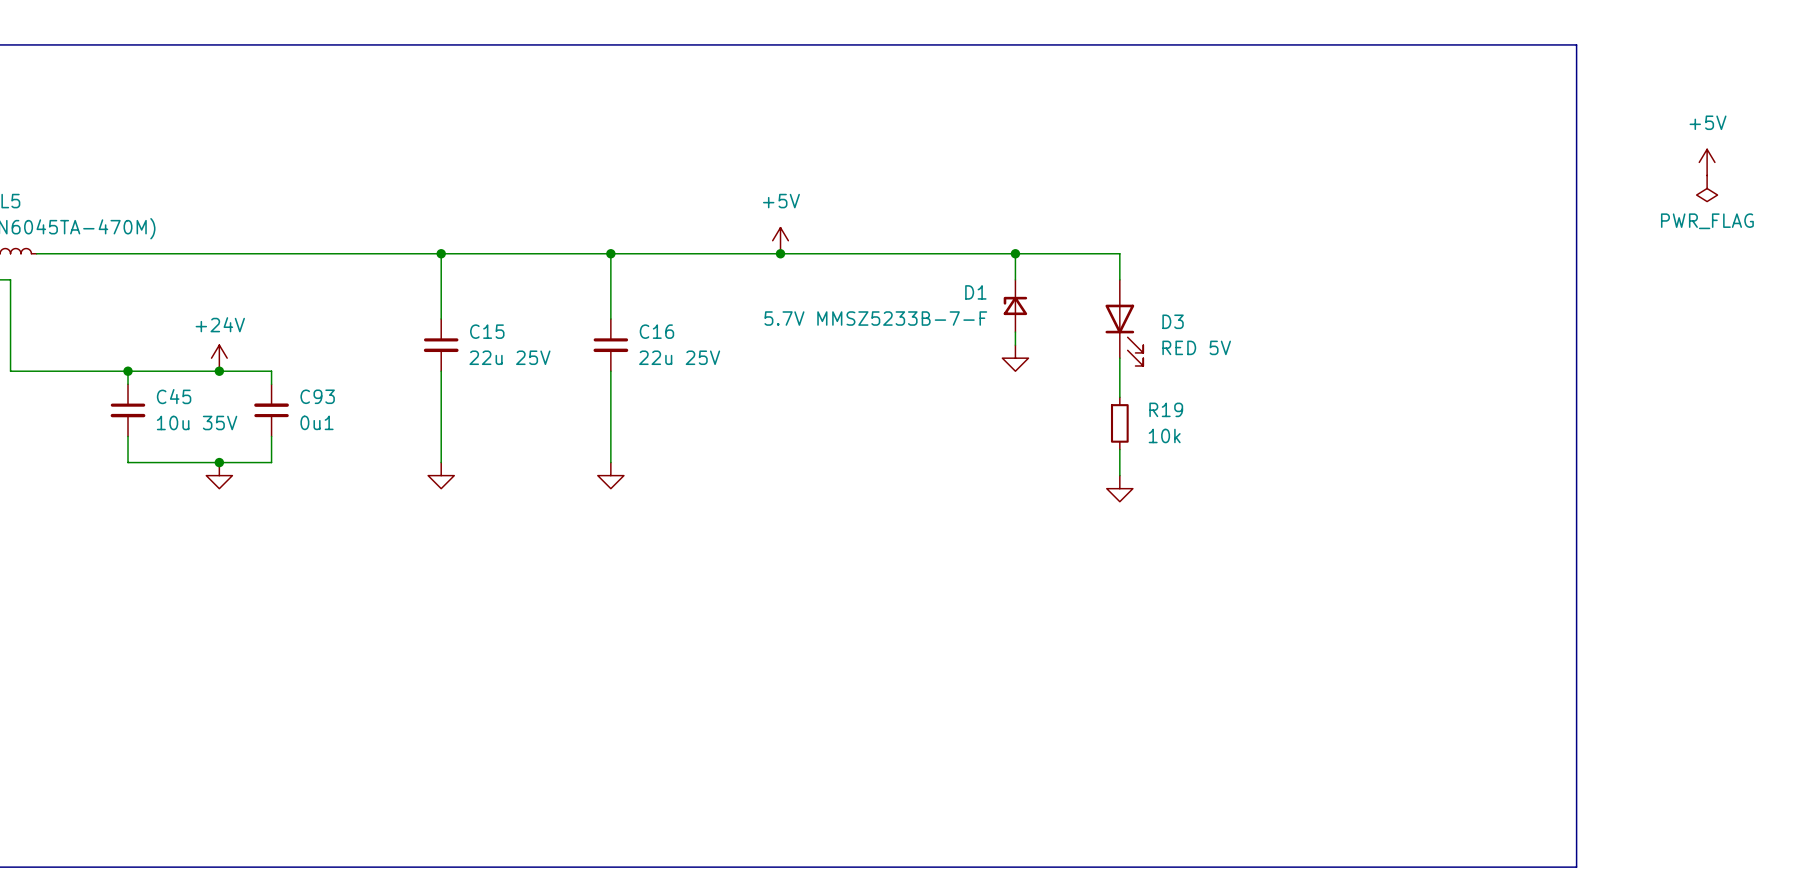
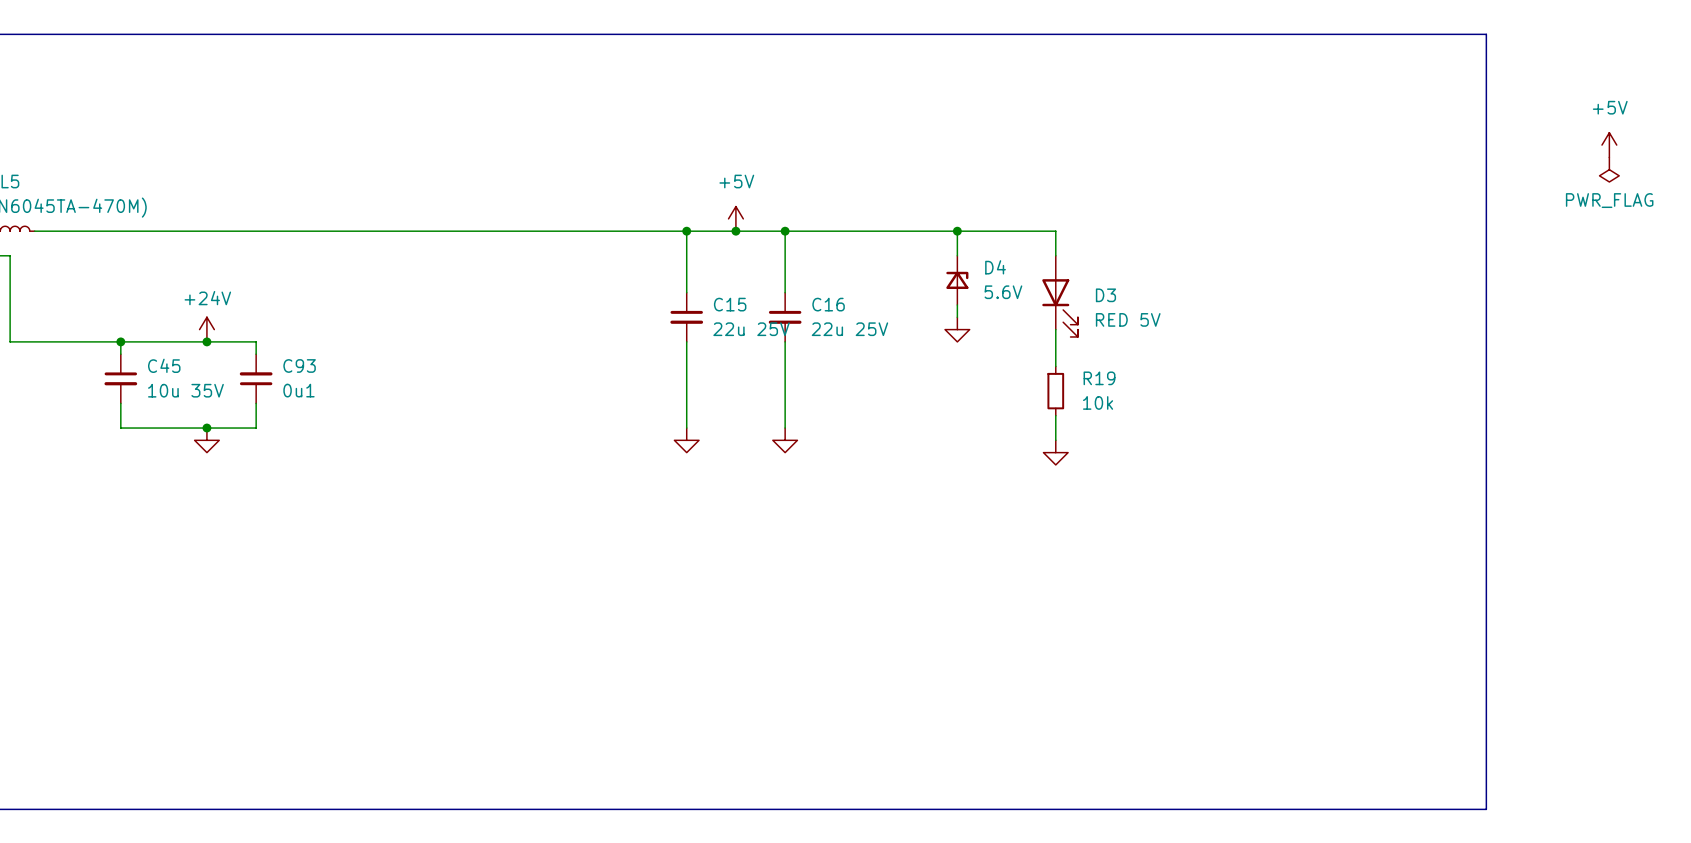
wire: (441, 253) (441, 319) -> none
junction: (441, 253) -> none
wire: (610, 253) (610, 319) -> (686, 231) (686, 292)
junction: (610, 253) -> none
junction: none -> (686, 231)
wire: none -> (785, 231) (785, 292)
junction: none -> (785, 231)
D1: 5.7V MMSZ5233B-7-F (1015, 305) -> none
D4: none -> 5.6V (957, 280)
C15 position: (441, 345) -> (686, 317)
C16 position: (610, 345) -> (785, 317)
wire: (441, 371) (441, 462) -> none
wire: (610, 371) (610, 462) -> (686, 341) (686, 428)
wire: none -> (785, 341) (785, 428)
power symbol: (441, 475) -> none
power symbol: (610, 475) -> none
power symbol: none -> (686, 440)
power symbol: none -> (785, 440)

